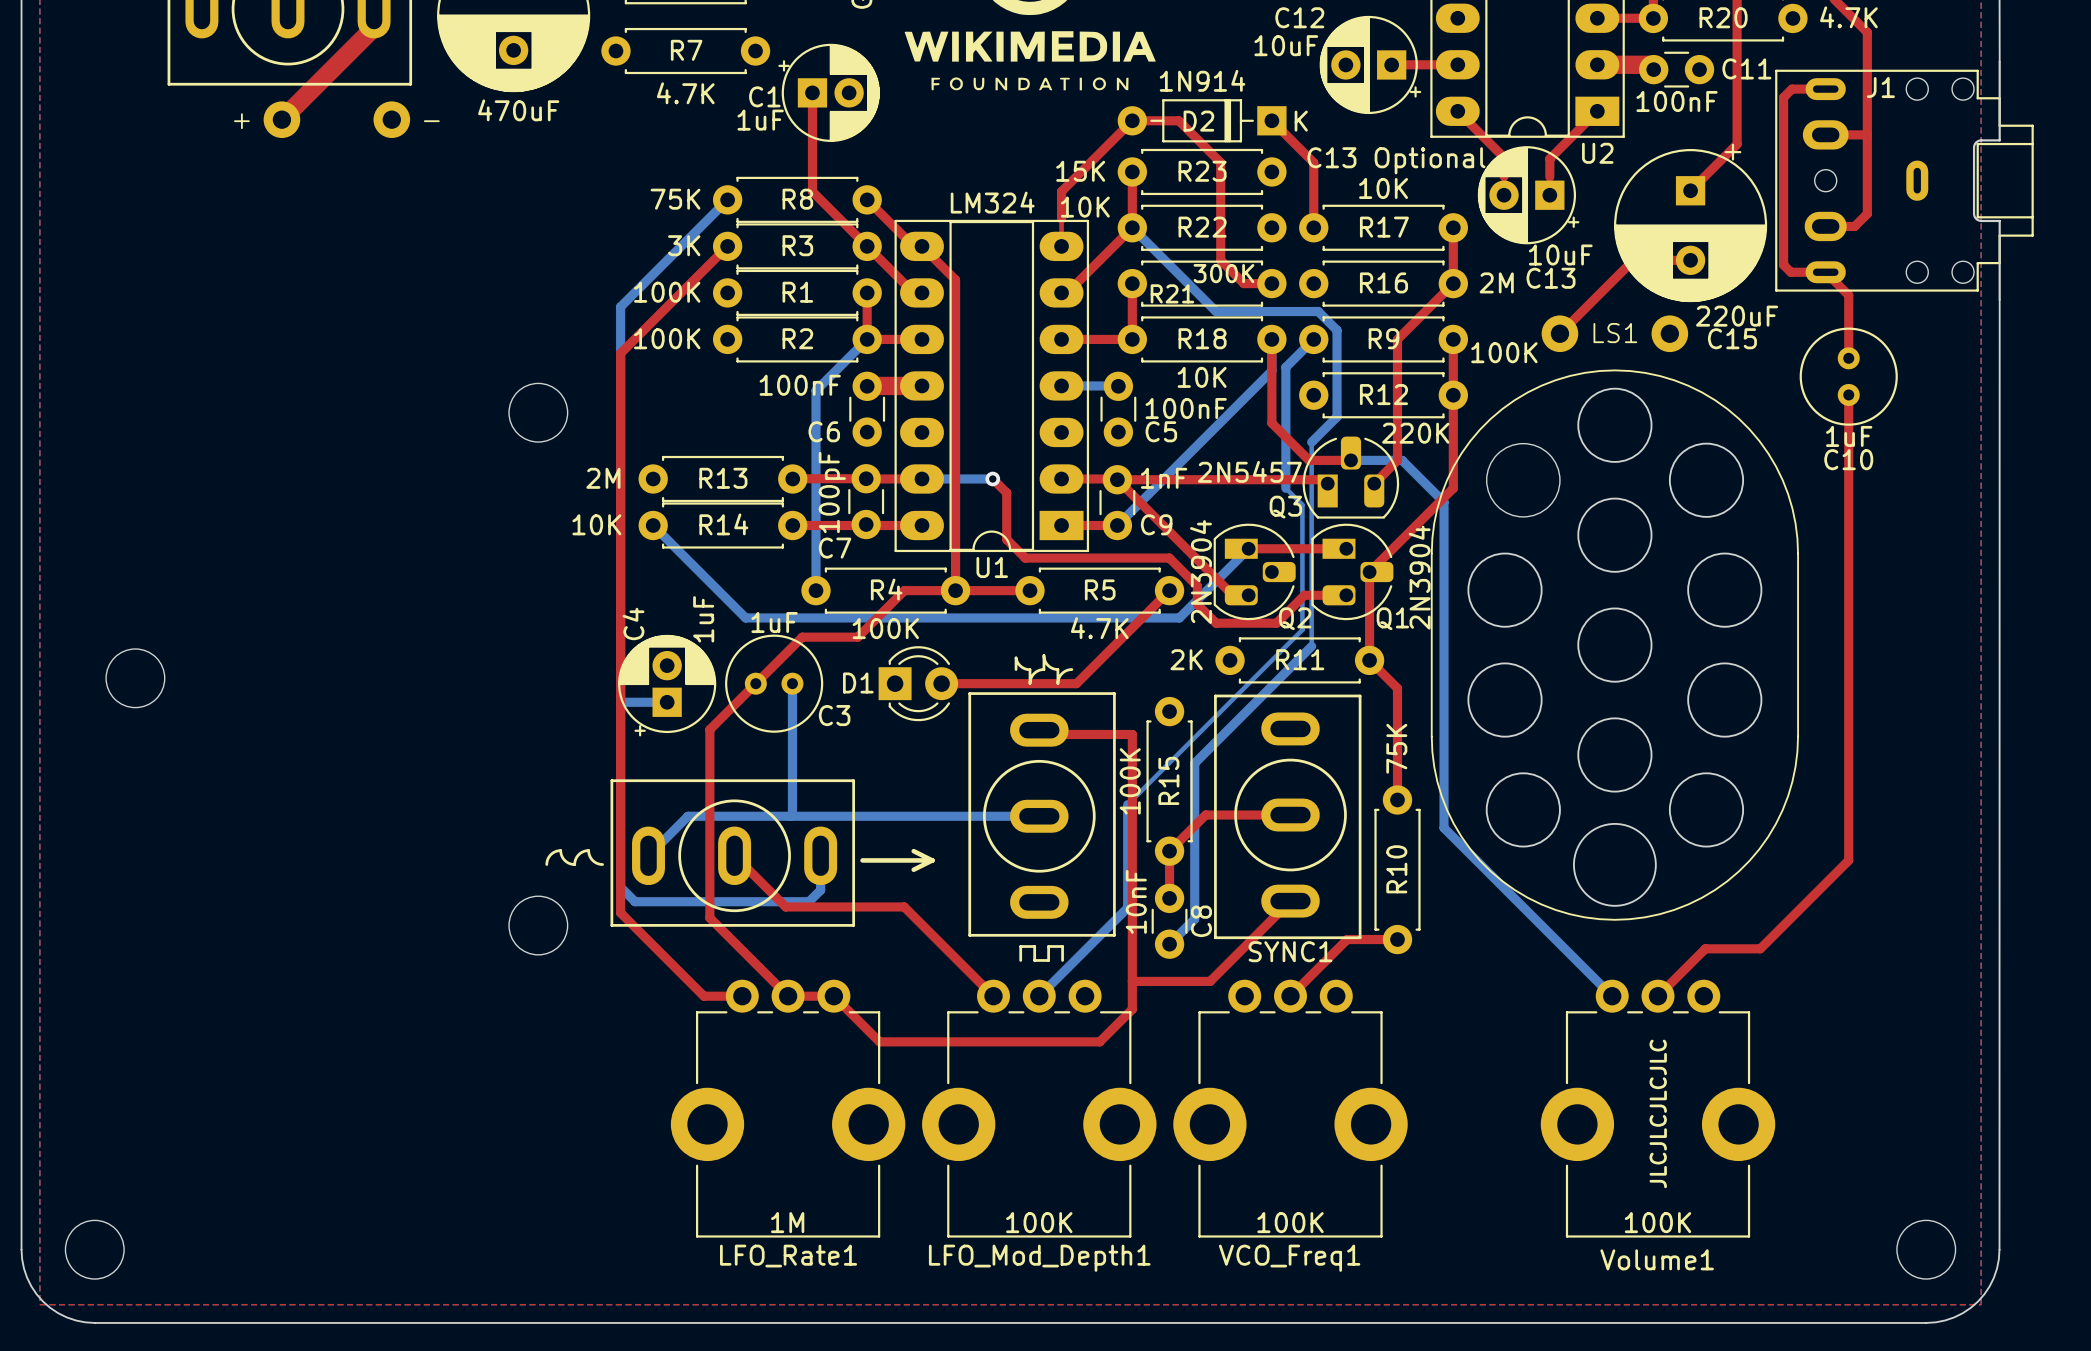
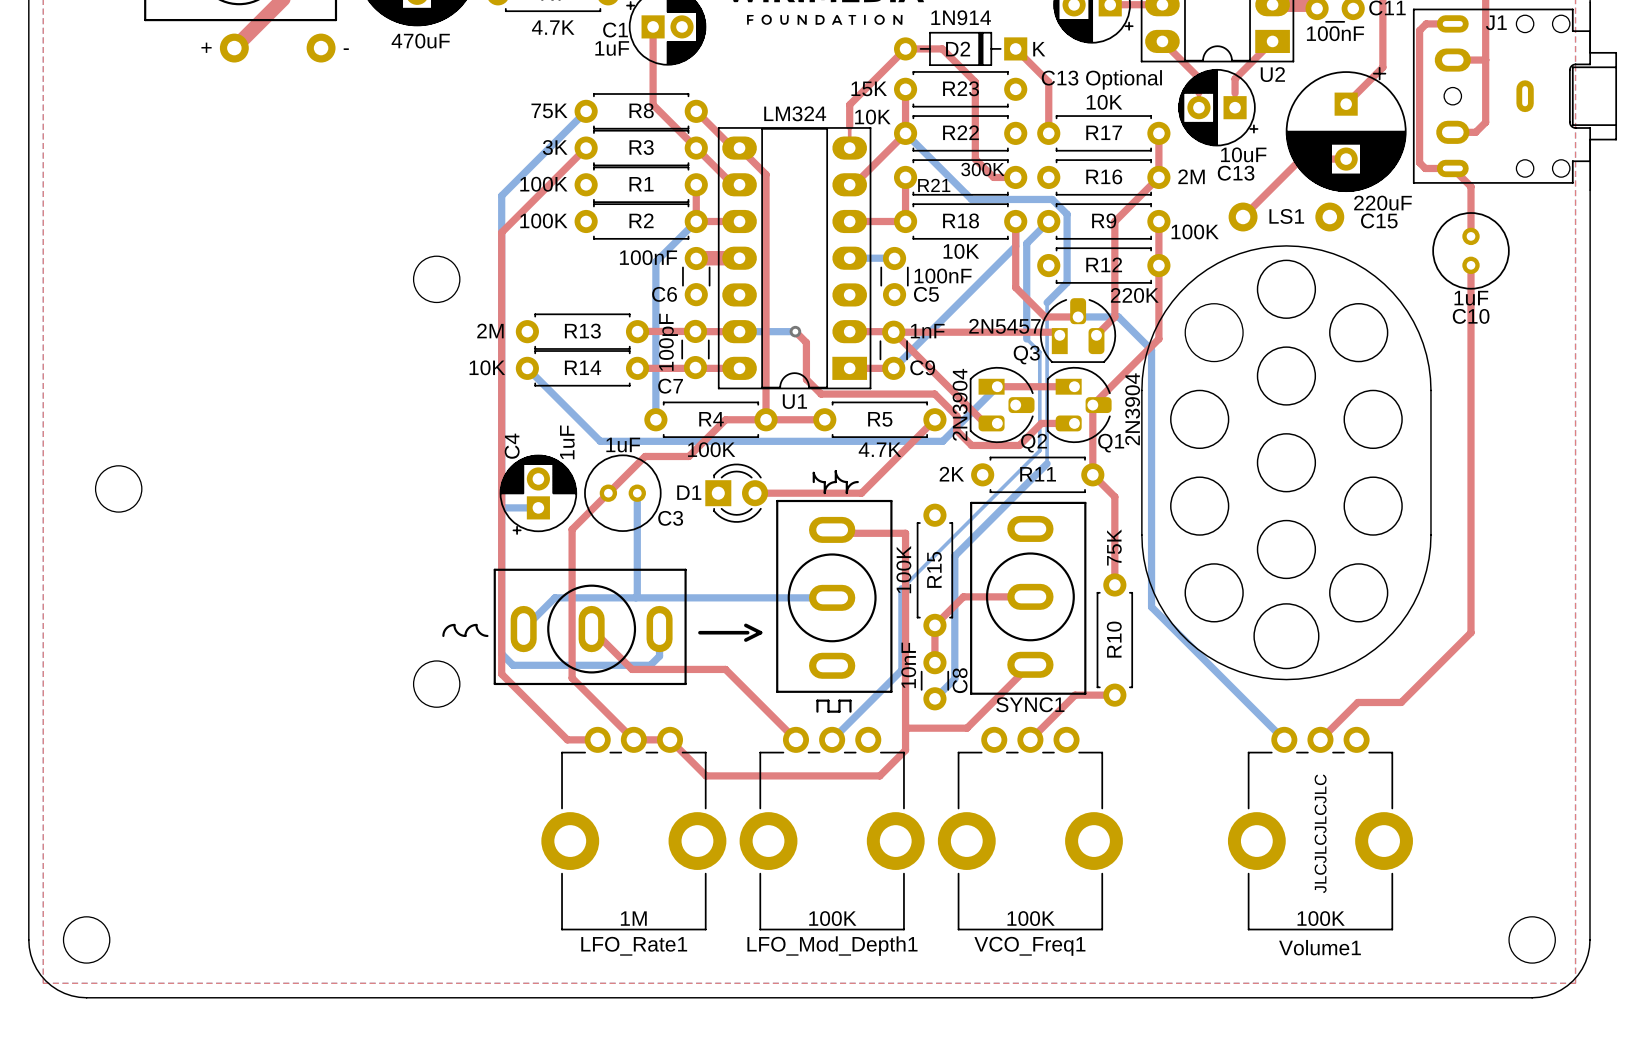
line: (913, 851) (932, 860) (913, 869) -> (745, 625) (760, 632) (745, 640)
line: (862, 860) (871, 860) -> none

